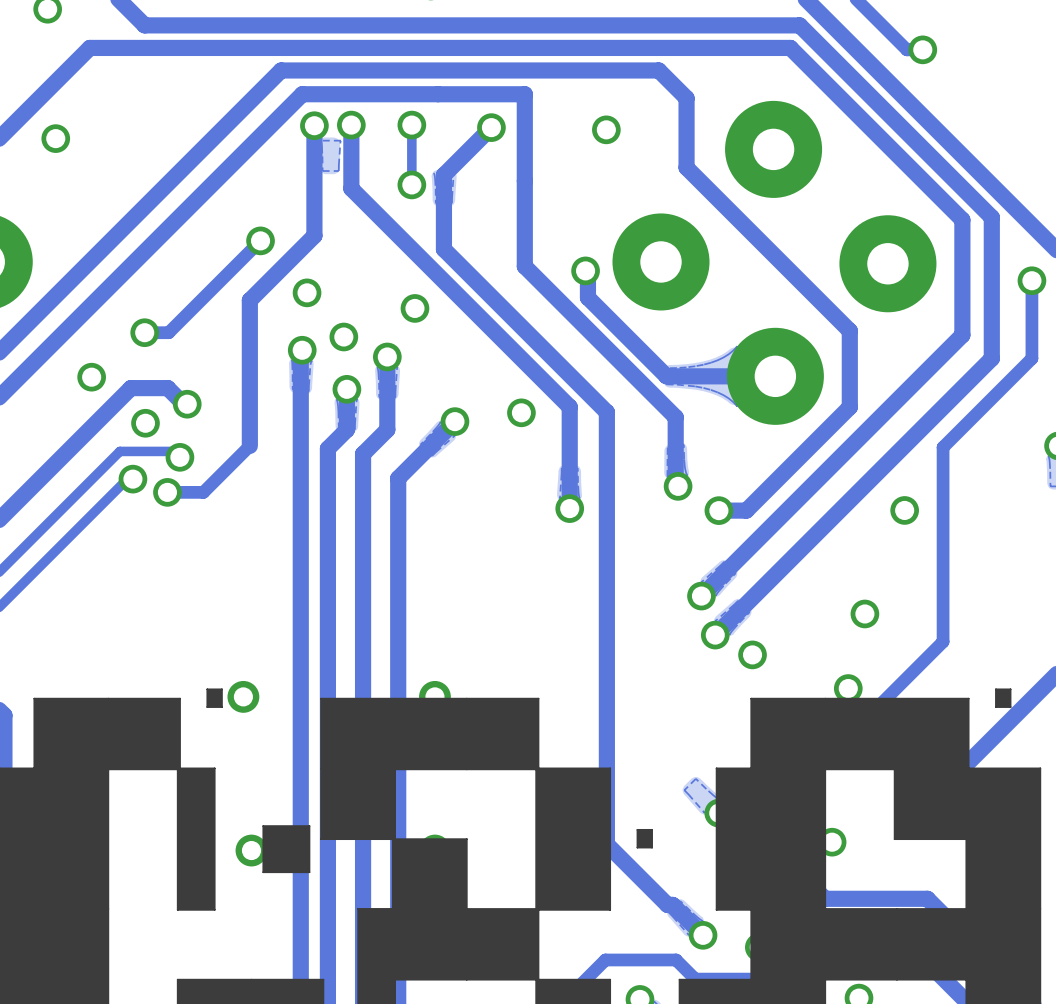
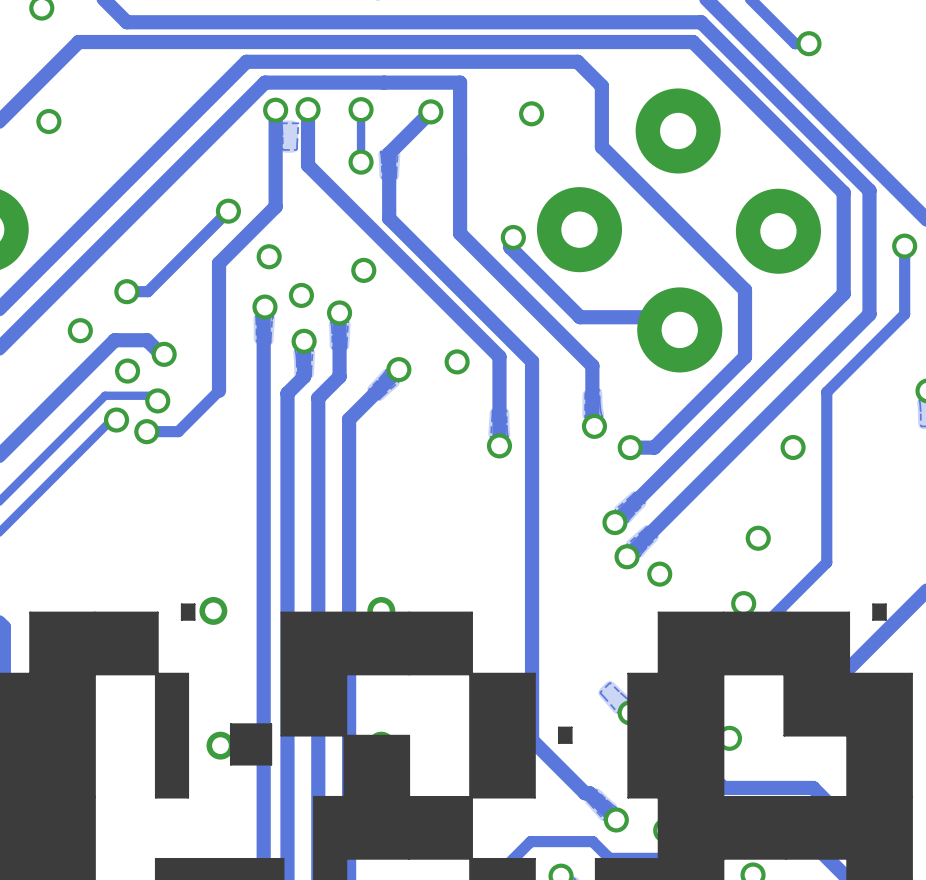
track: none -> (510, 239) (510, 247) (580, 317) (680, 317)
track: (585, 274) (587, 276) (587, 297) (666, 376) (741, 376) (752, 365) -> none
zone outline: (737, 346) (737, 406) (728, 398) (710, 389) (695, 386) (666, 384) (666, 368) (686, 367) (710, 362) (723, 357) (737, 346) -> none

